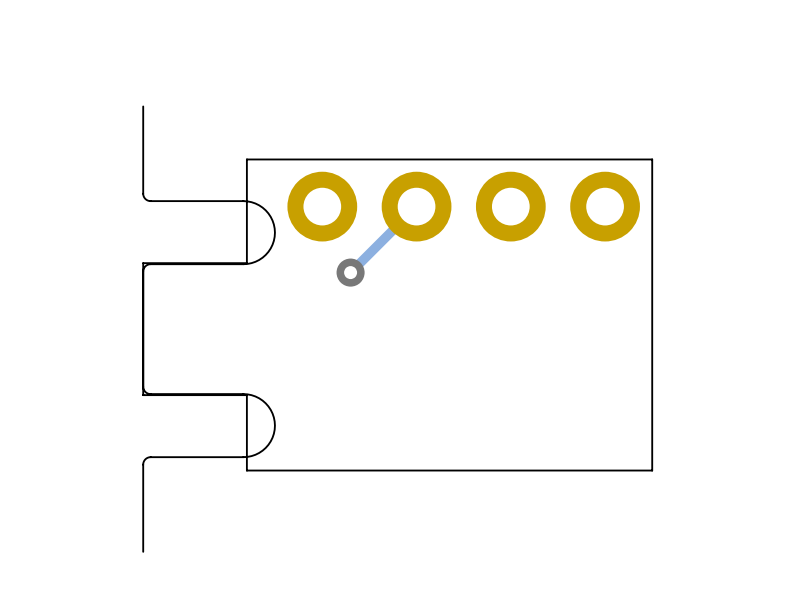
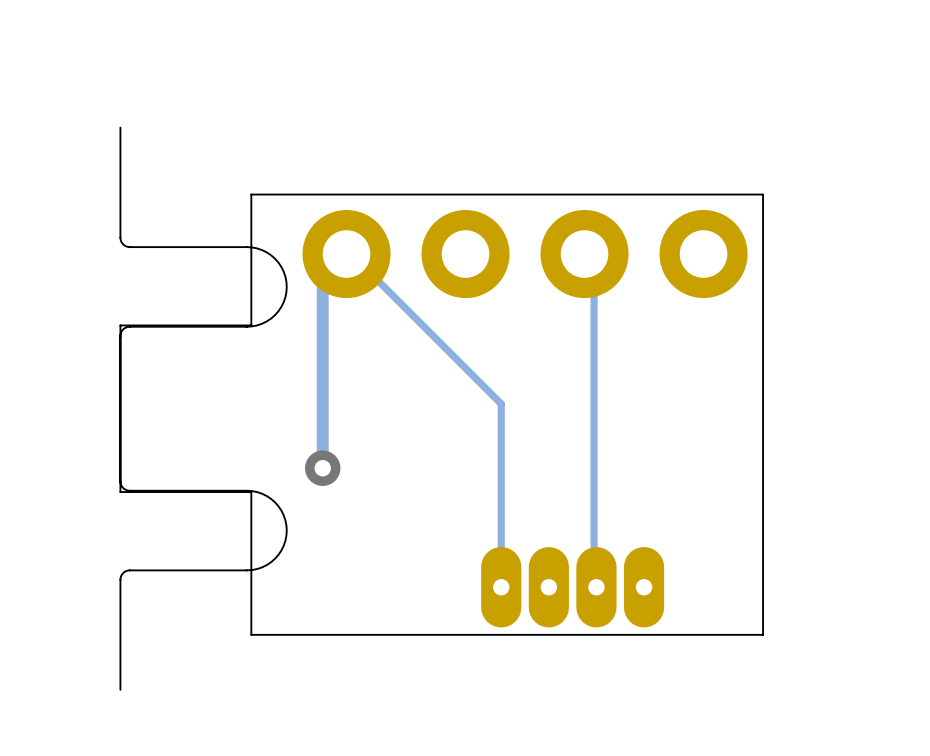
track: (416, 206) (350, 272) -> none
track: none -> (584, 254) (594, 261) (594, 582) (596, 587)
via position: (350, 272) -> (322, 468)
track: none -> (322, 468) (322, 277) (346, 254) (351, 254) (501, 403) (501, 587)
part: none -> (572, 587)
board edge: (652, 470) (246, 470) -> (763, 587) (763, 634) (251, 634) (251, 587)

